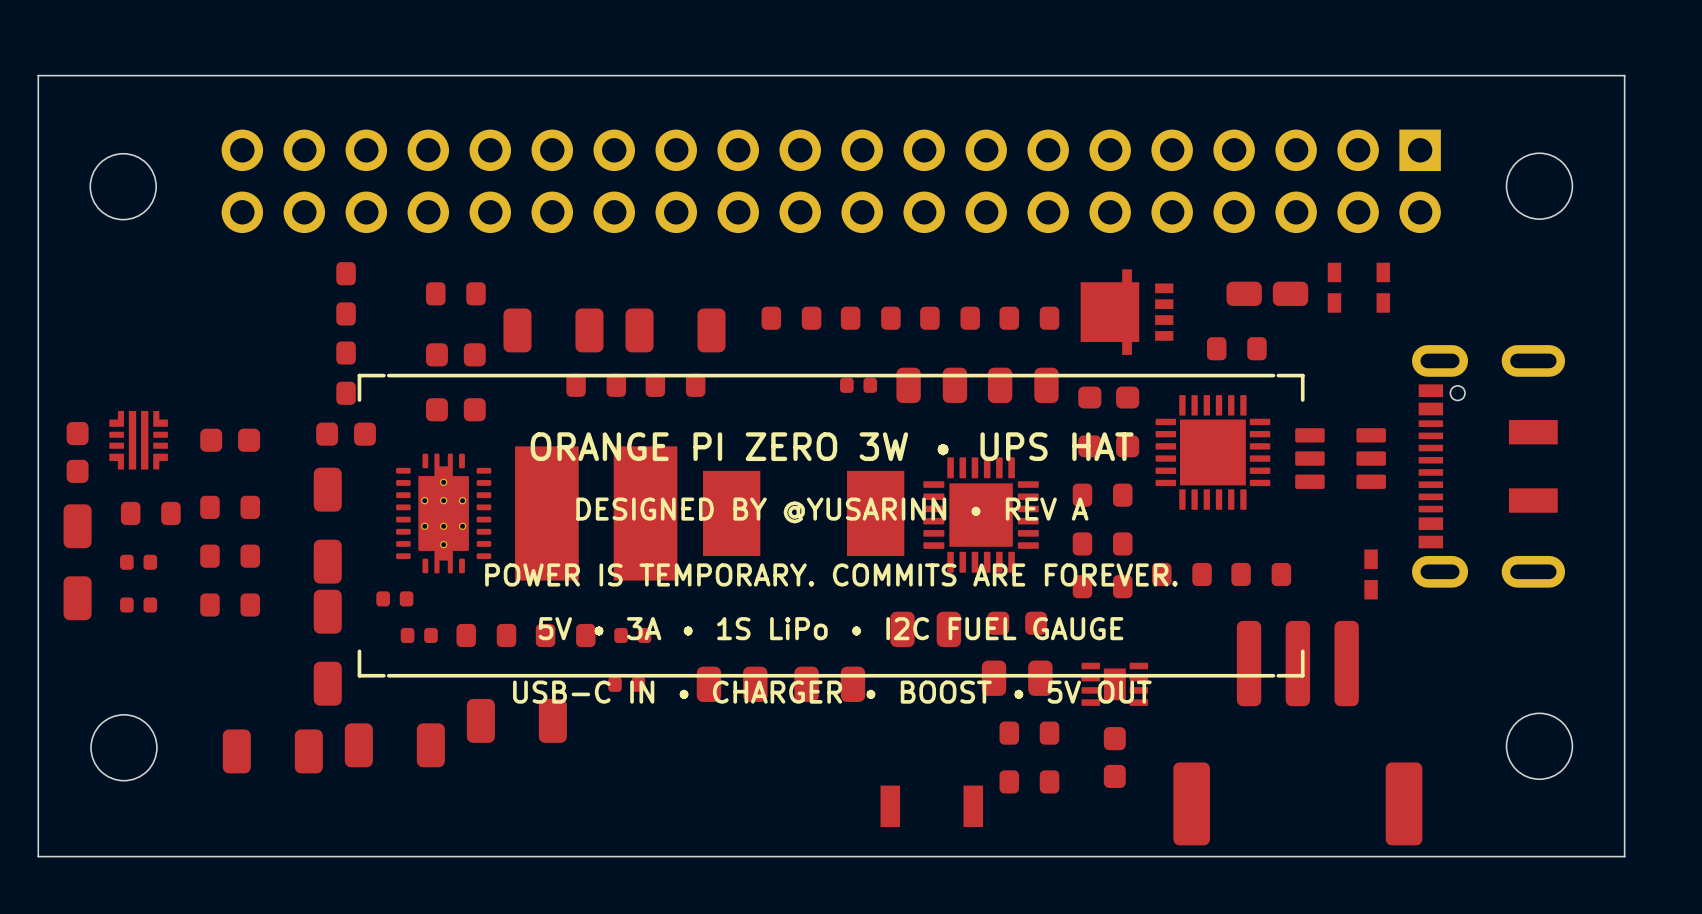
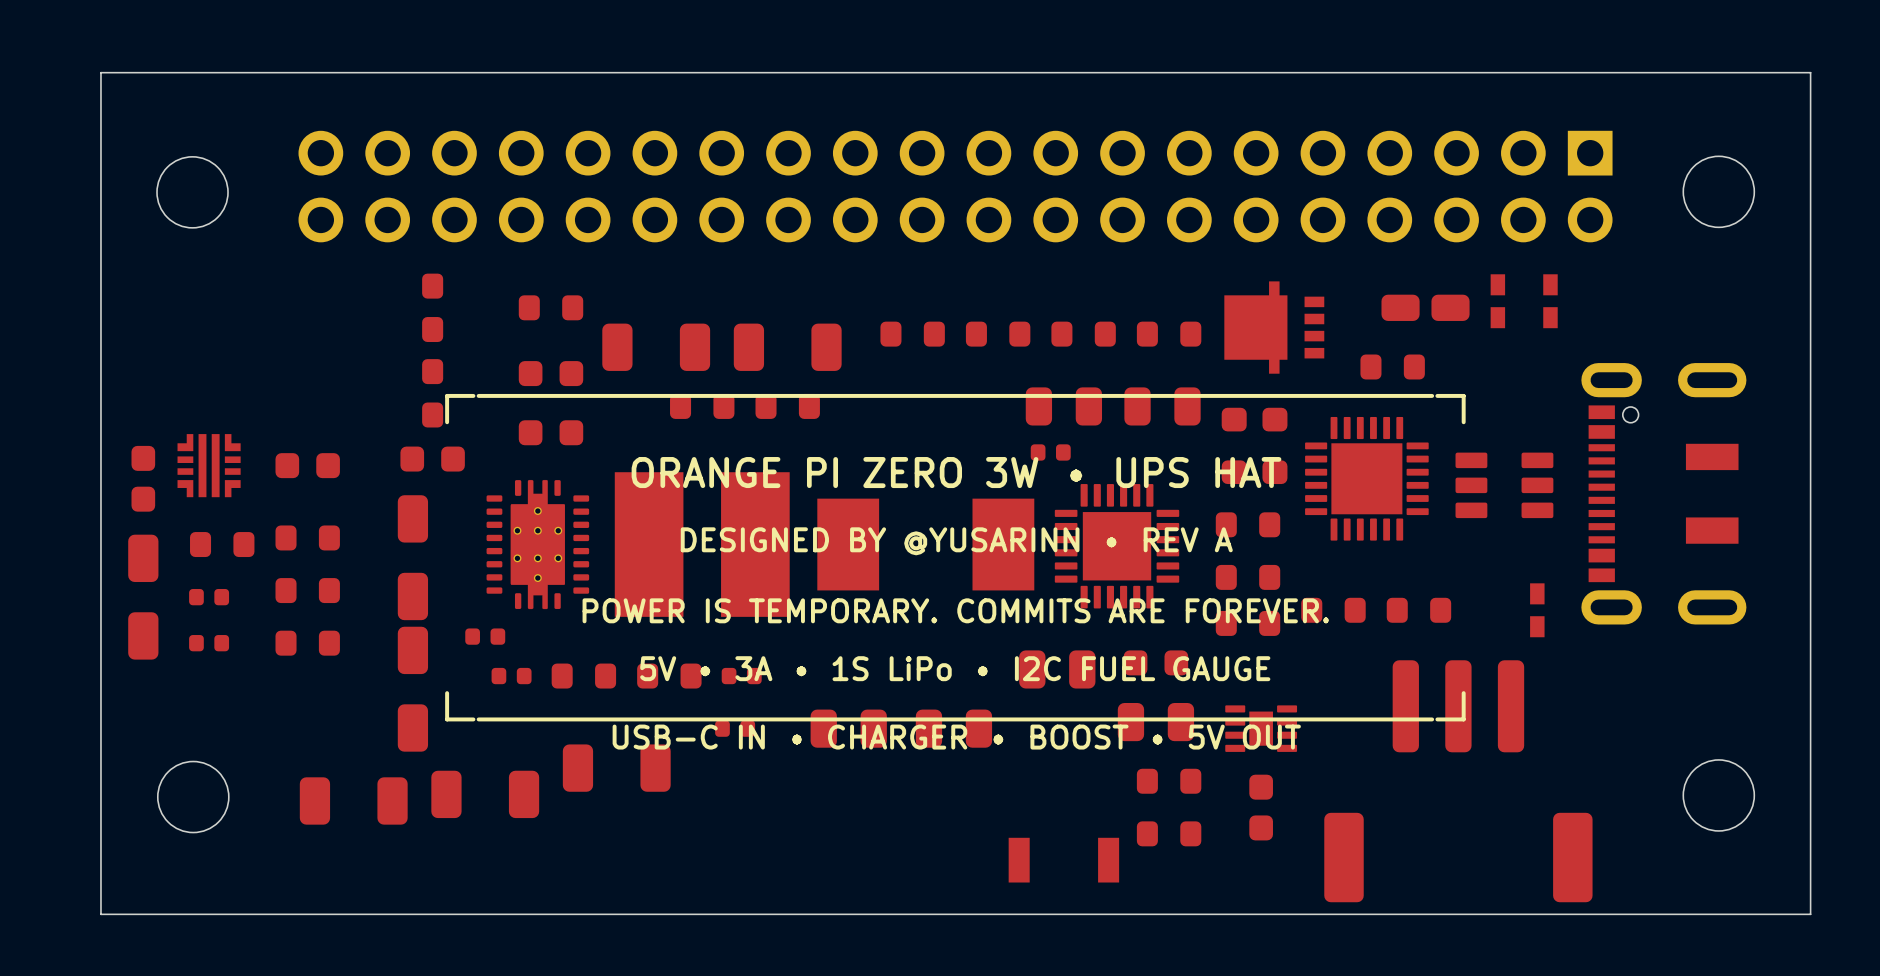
part position: (858, 385) -> (1050, 452)

